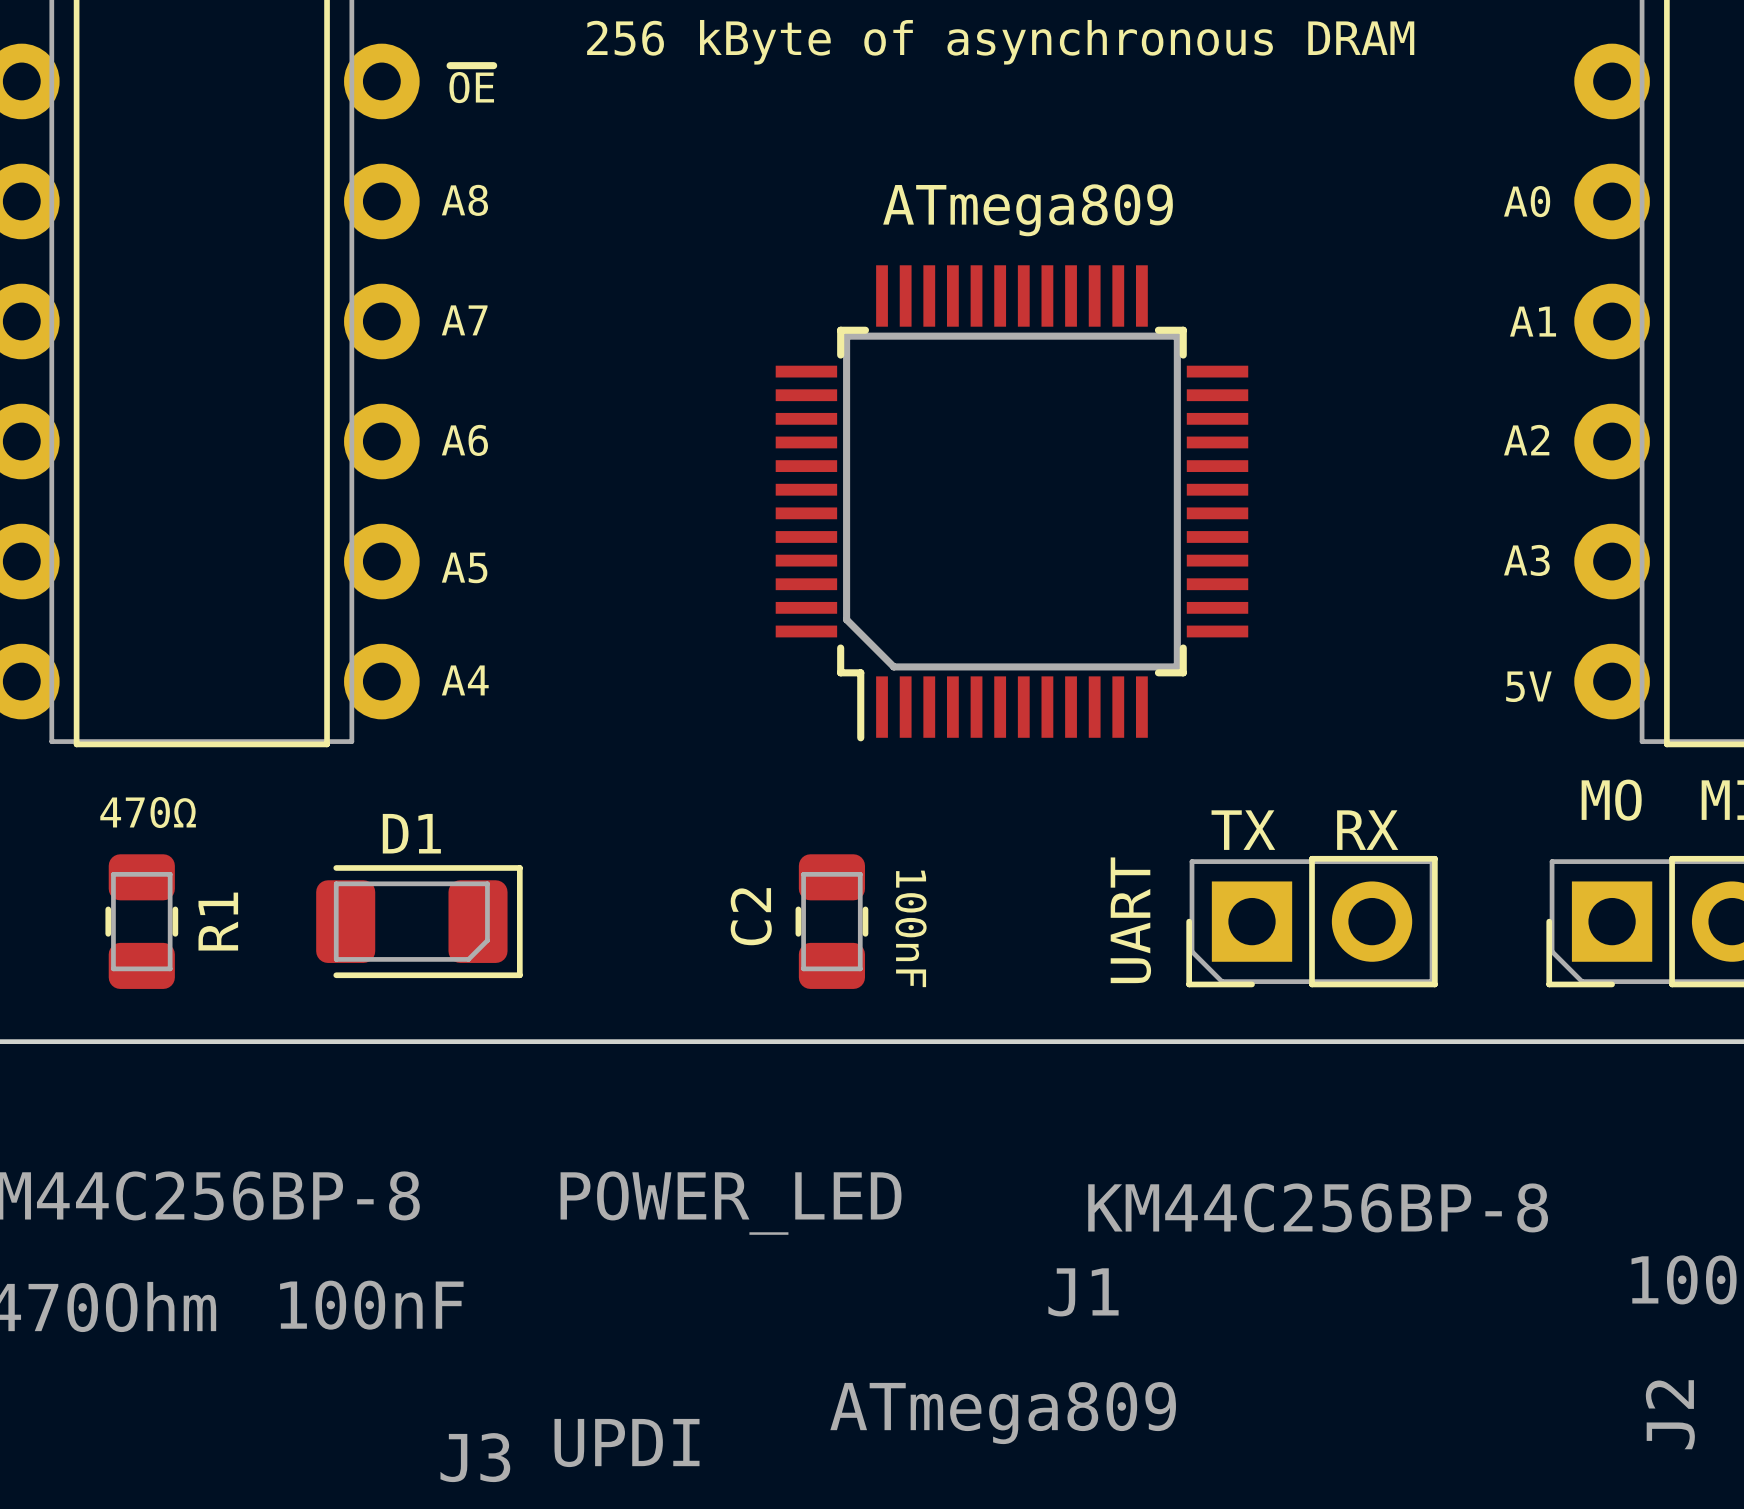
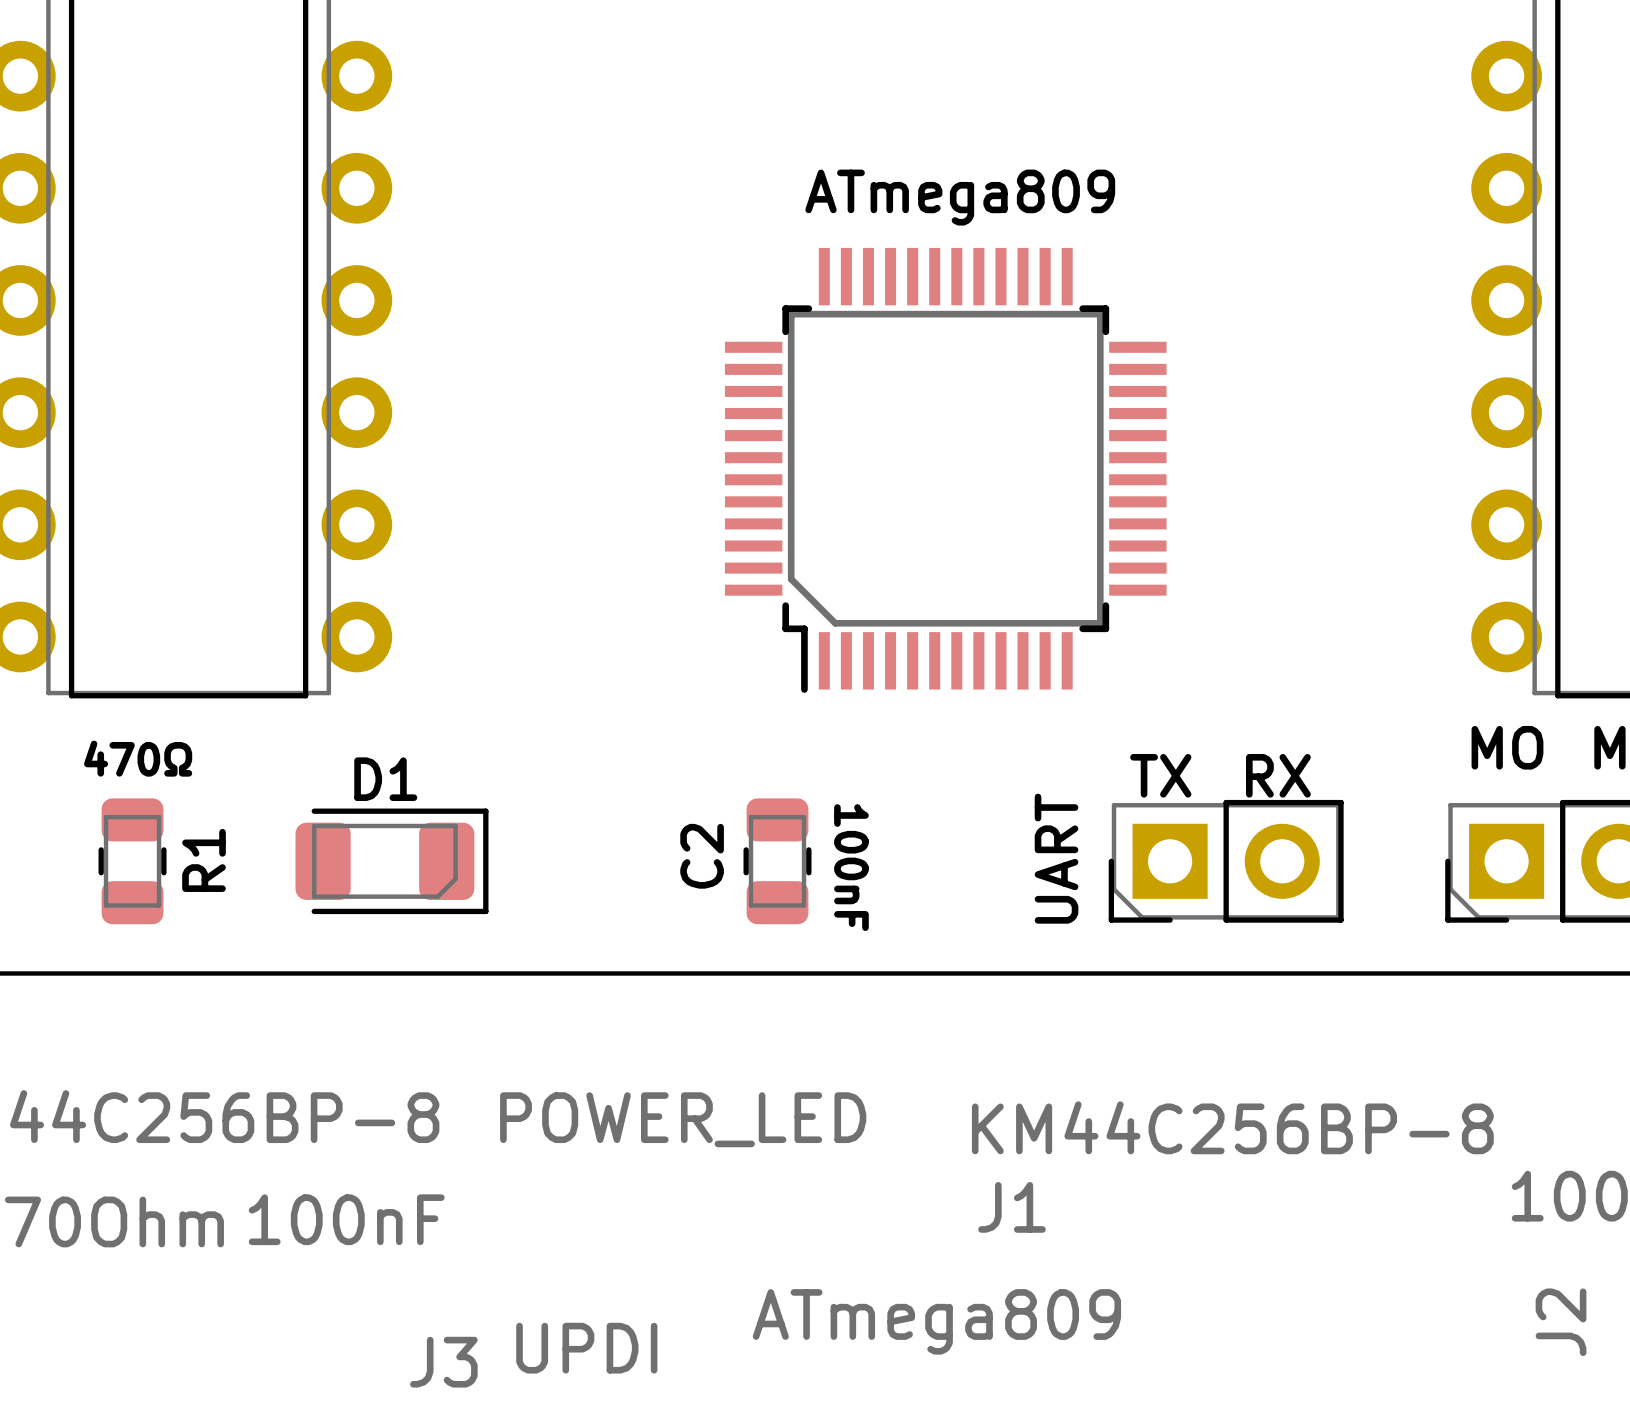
text: 256 kByte of asynchronous DRAM (1000, 42) -> none
text: ~{OE} (471, 84) -> none
text: A8 (464, 200) -> none
text: A0 (1527, 201) -> none
text: A7 (464, 320) -> none
text: A1 (1533, 321) -> none
text: A6 (464, 440) -> none
text: A2 (1526, 440) -> none
text: A3 (1526, 560) -> none
text: A5 (464, 567) -> none
text: A4 (465, 680) -> none
text: 5V (1528, 686) -> none

